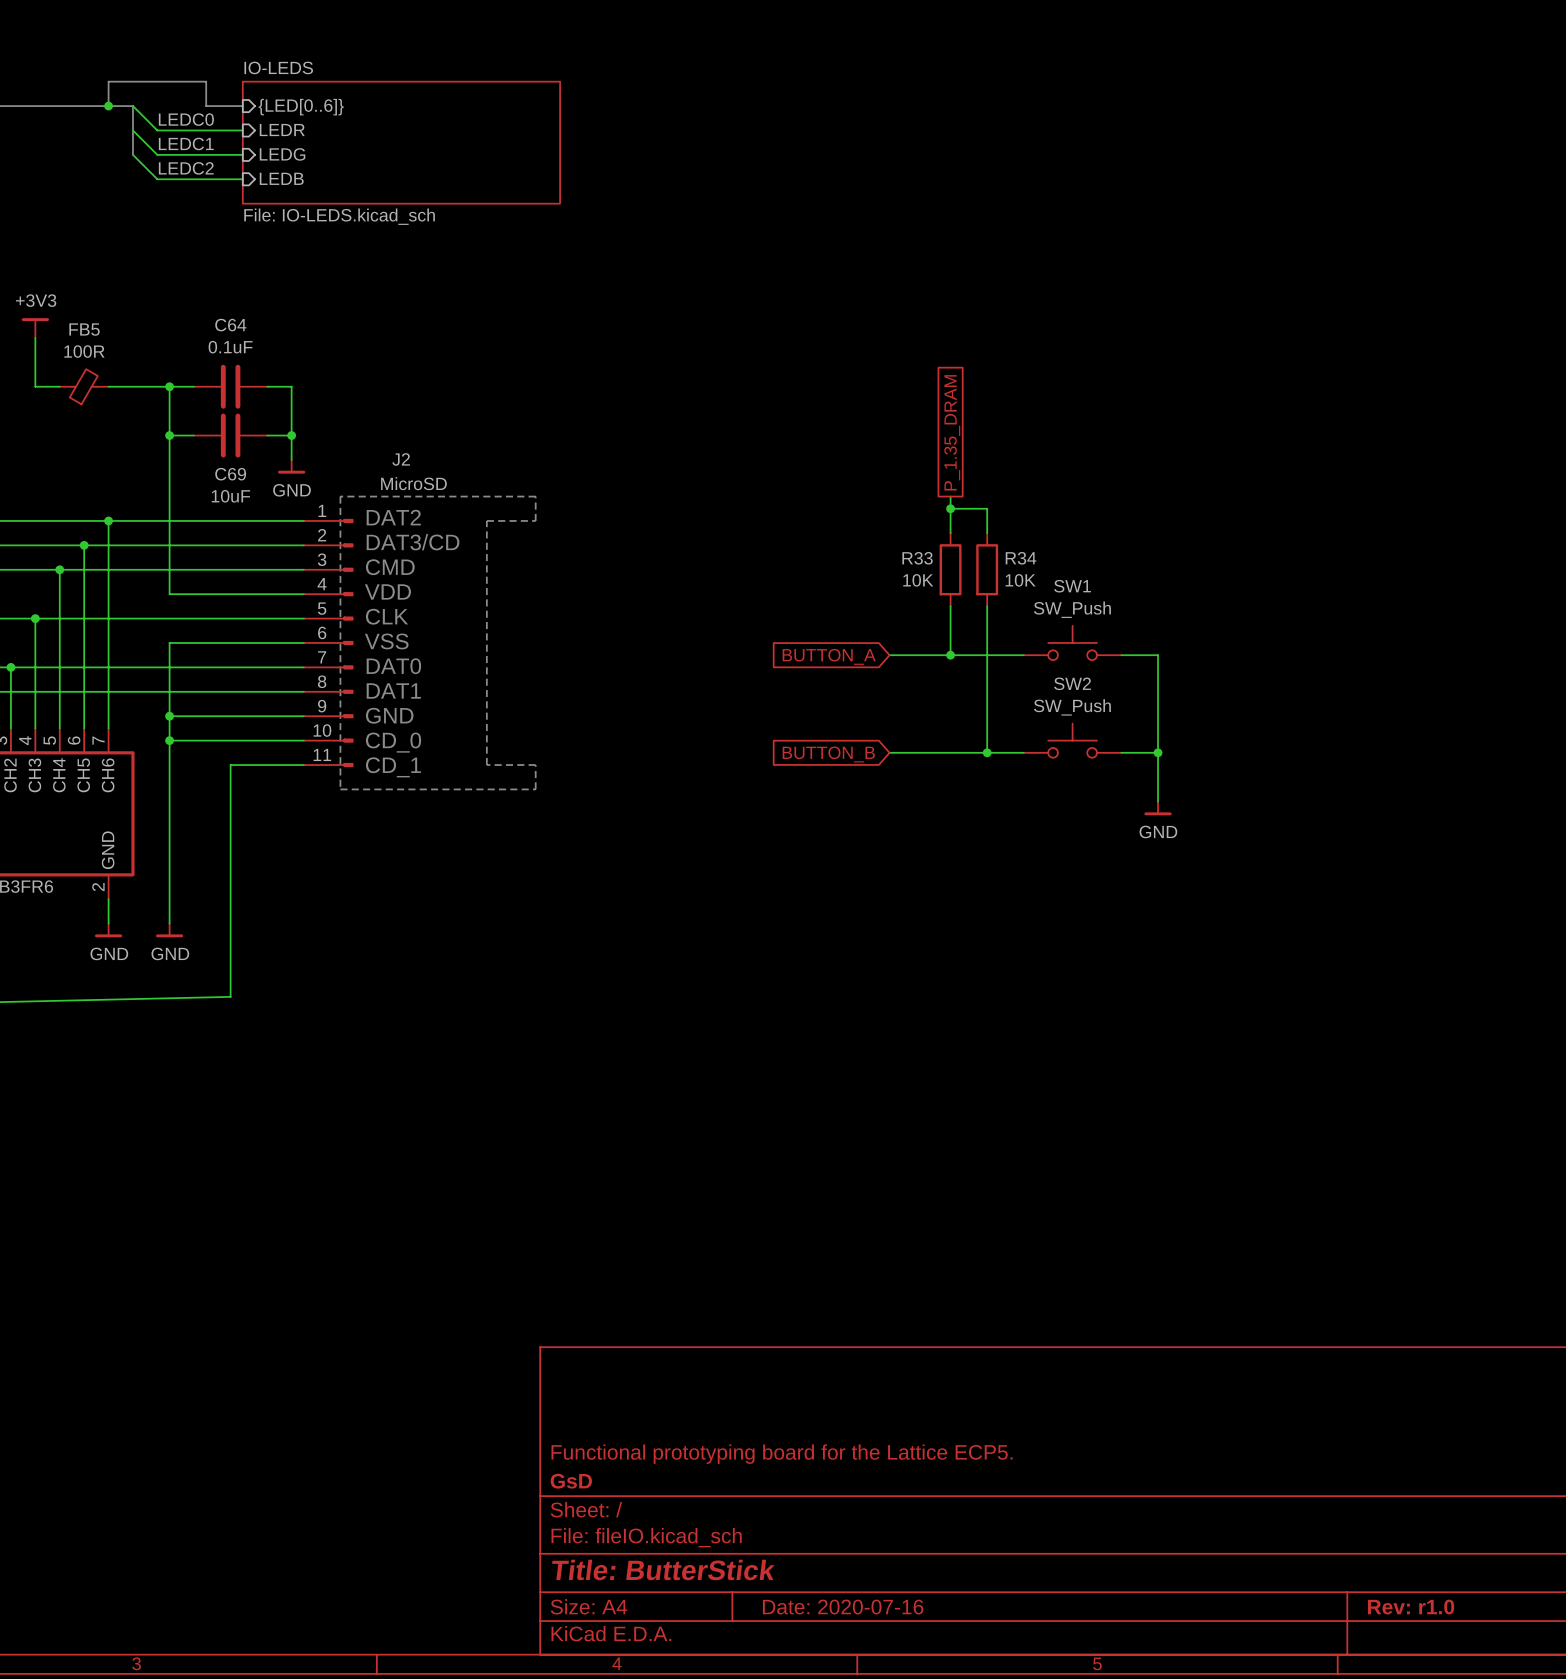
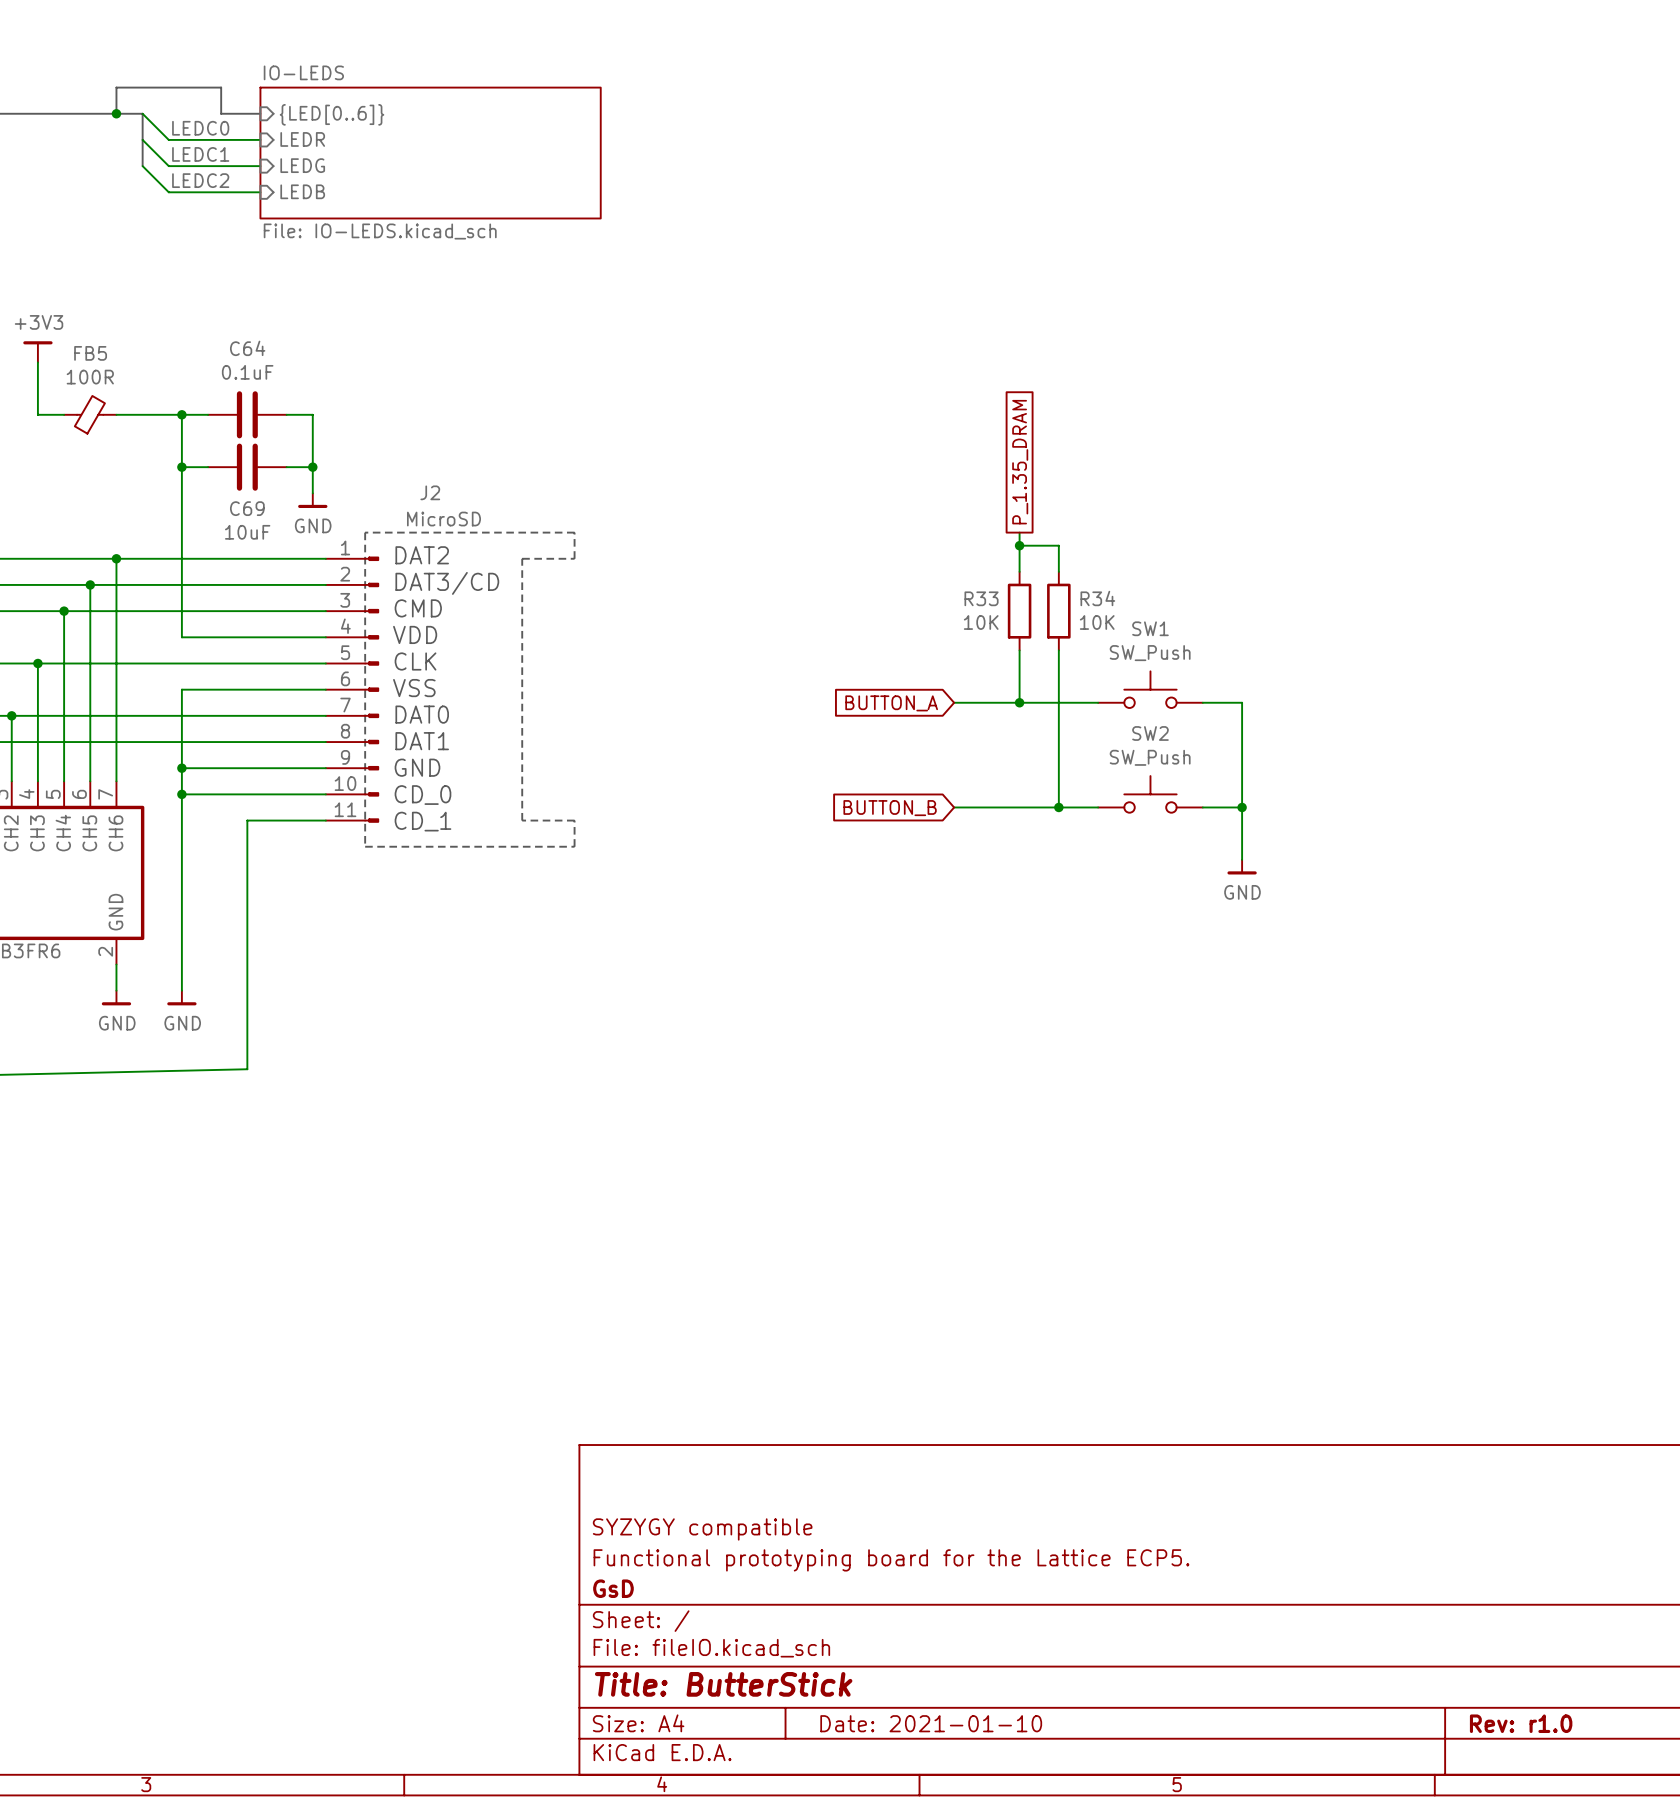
title block: none -> SYZYGY compatible (702, 1529)
title block: Date: 2020-07-16 (843, 1607) -> Date: 2021-01-10 (931, 1723)

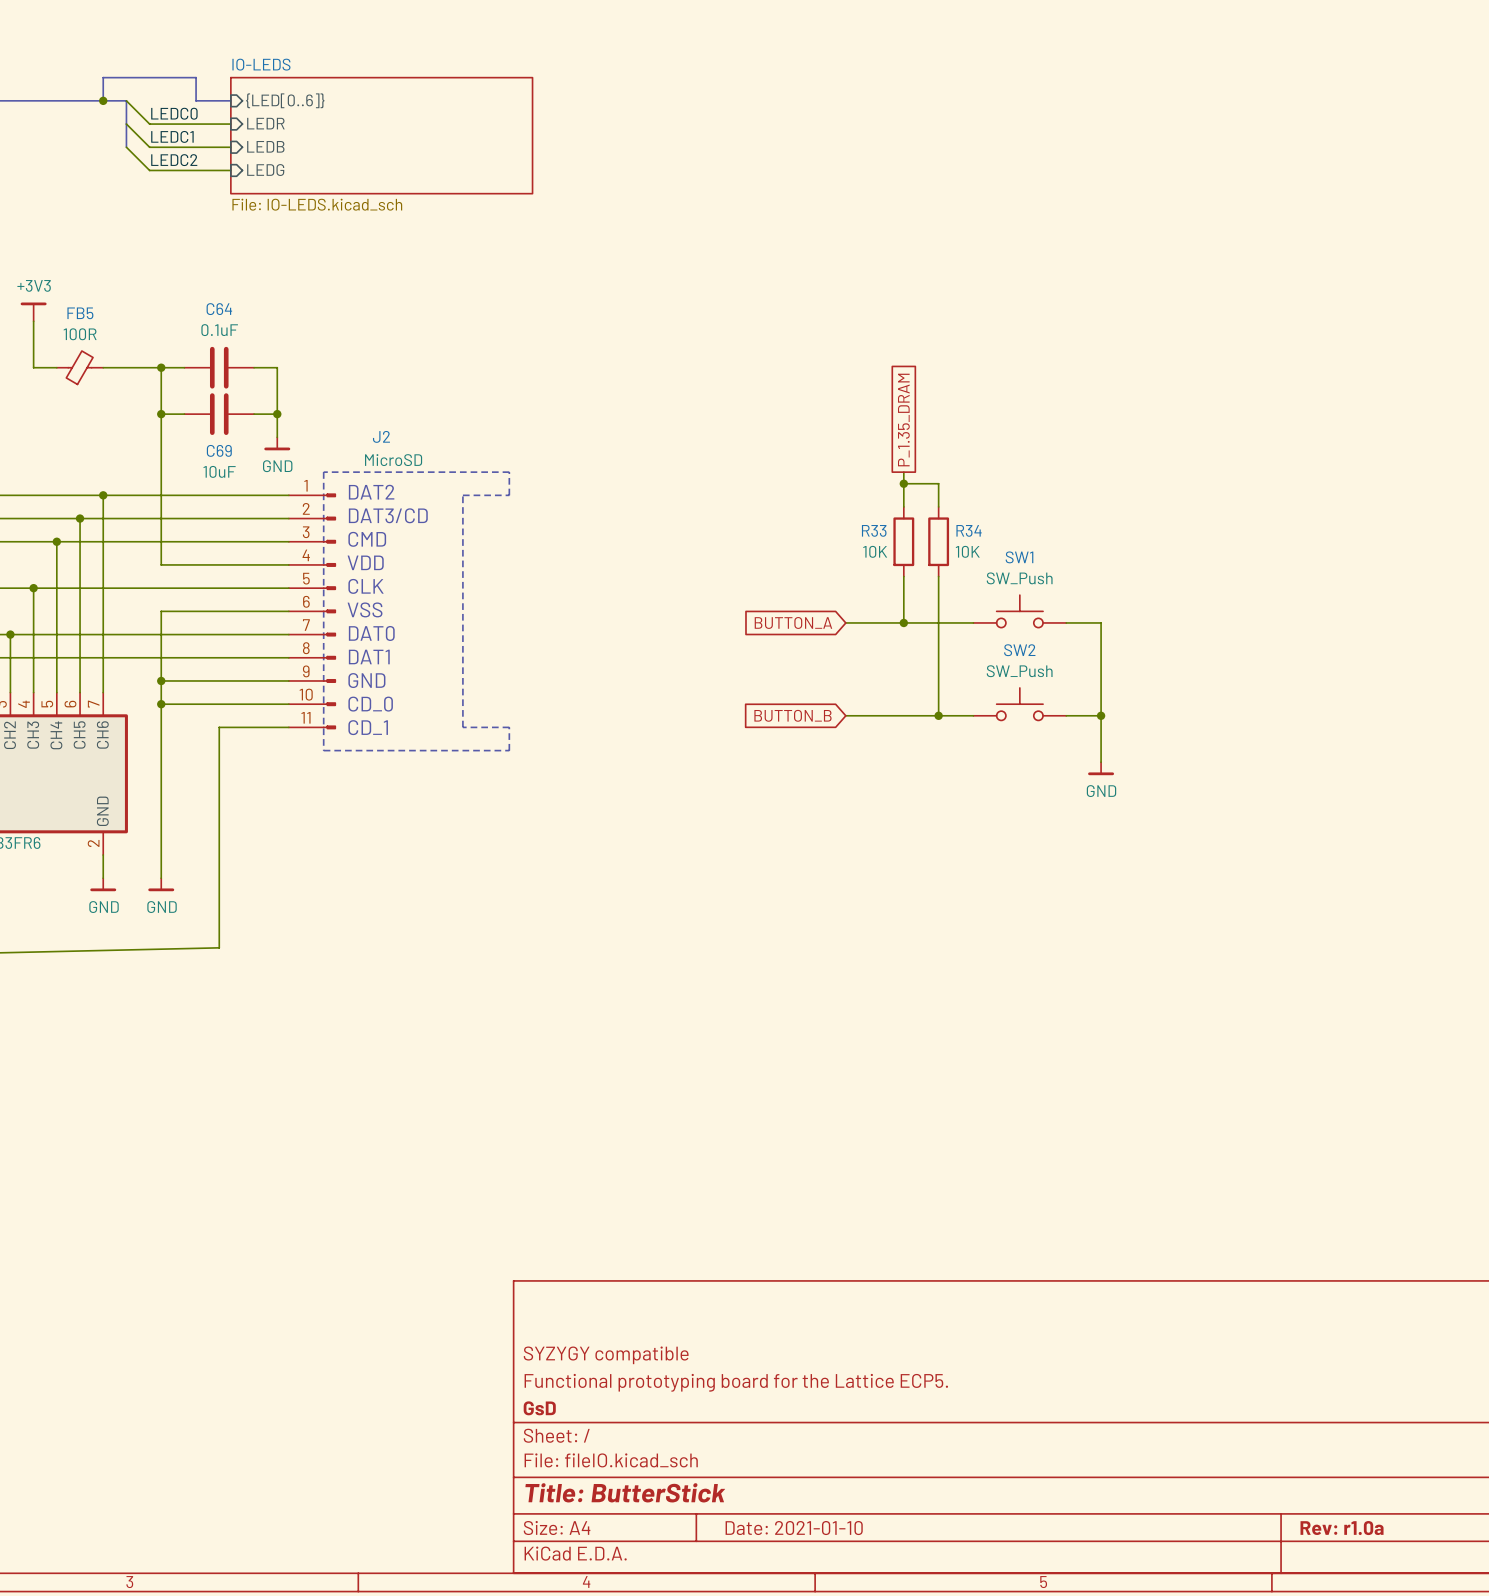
sheet pin: LEDG (302, 165) -> LEDB (265, 146)
sheet pin: LEDB (302, 191) -> LEDG (265, 170)
title block: Rev: r1.0 (1521, 1723) -> Rev: r1.0a (1342, 1528)

